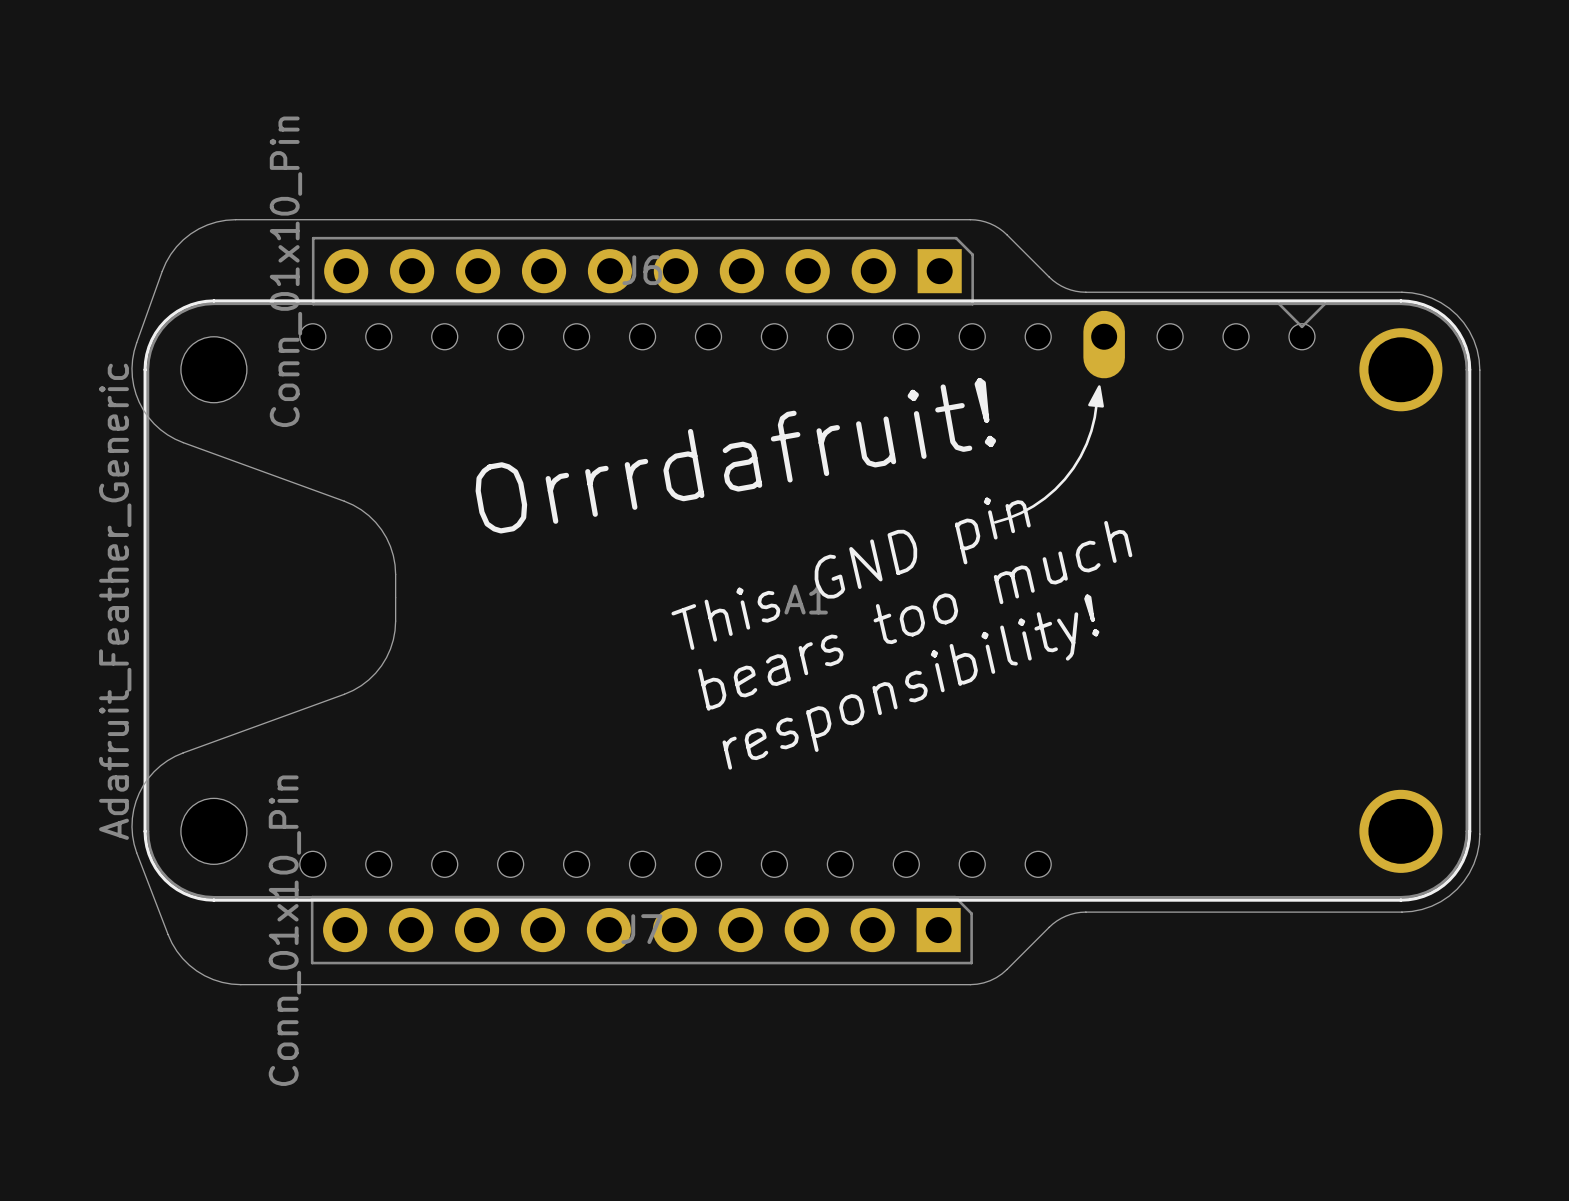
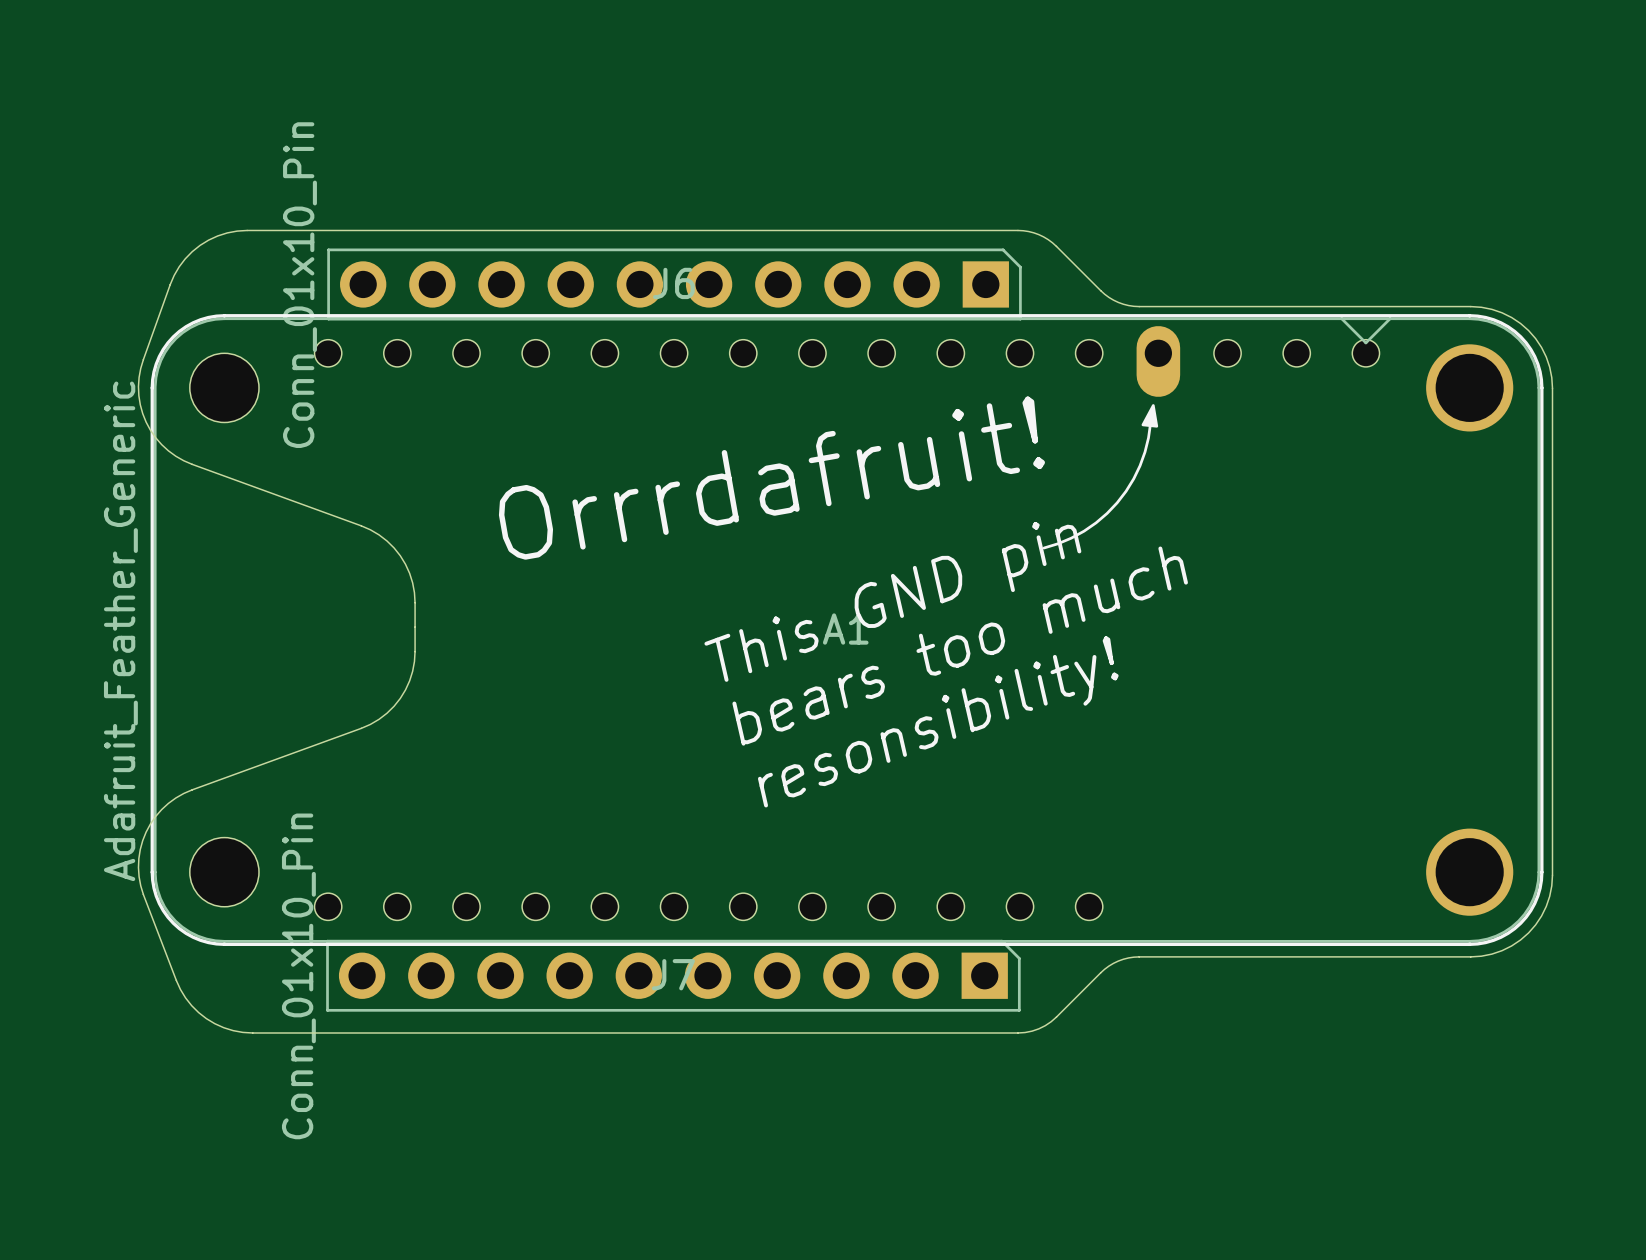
text: responsibility! (910, 682) -> resonsibility! (938, 721)

